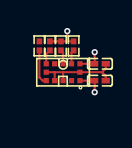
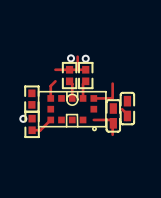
via: (67, 31) -> none
via: none -> (71, 58)
via: none -> (85, 58)
part: (39, 45) -> none
part: (49, 45) -> none
track: (39, 50) (39, 77) (42, 80) (46, 80) -> (32, 130) (40, 130) (50, 119)
via: (94, 52) -> none
part footprint: [36, 57, 90, 90] -> [37, 91, 107, 132]
part: (99, 63) -> none
track: (105, 63) (105, 68) (102, 72) (46, 72) -> none
part: none -> (31, 99)
part: none -> (127, 108)
track: (54, 72) (54, 80) -> none
track: (63, 72) (63, 80) -> none
part: none -> (113, 115)
via: none -> (23, 118)
part: (99, 80) -> none
part: none -> (32, 124)
via: (94, 92) -> none

